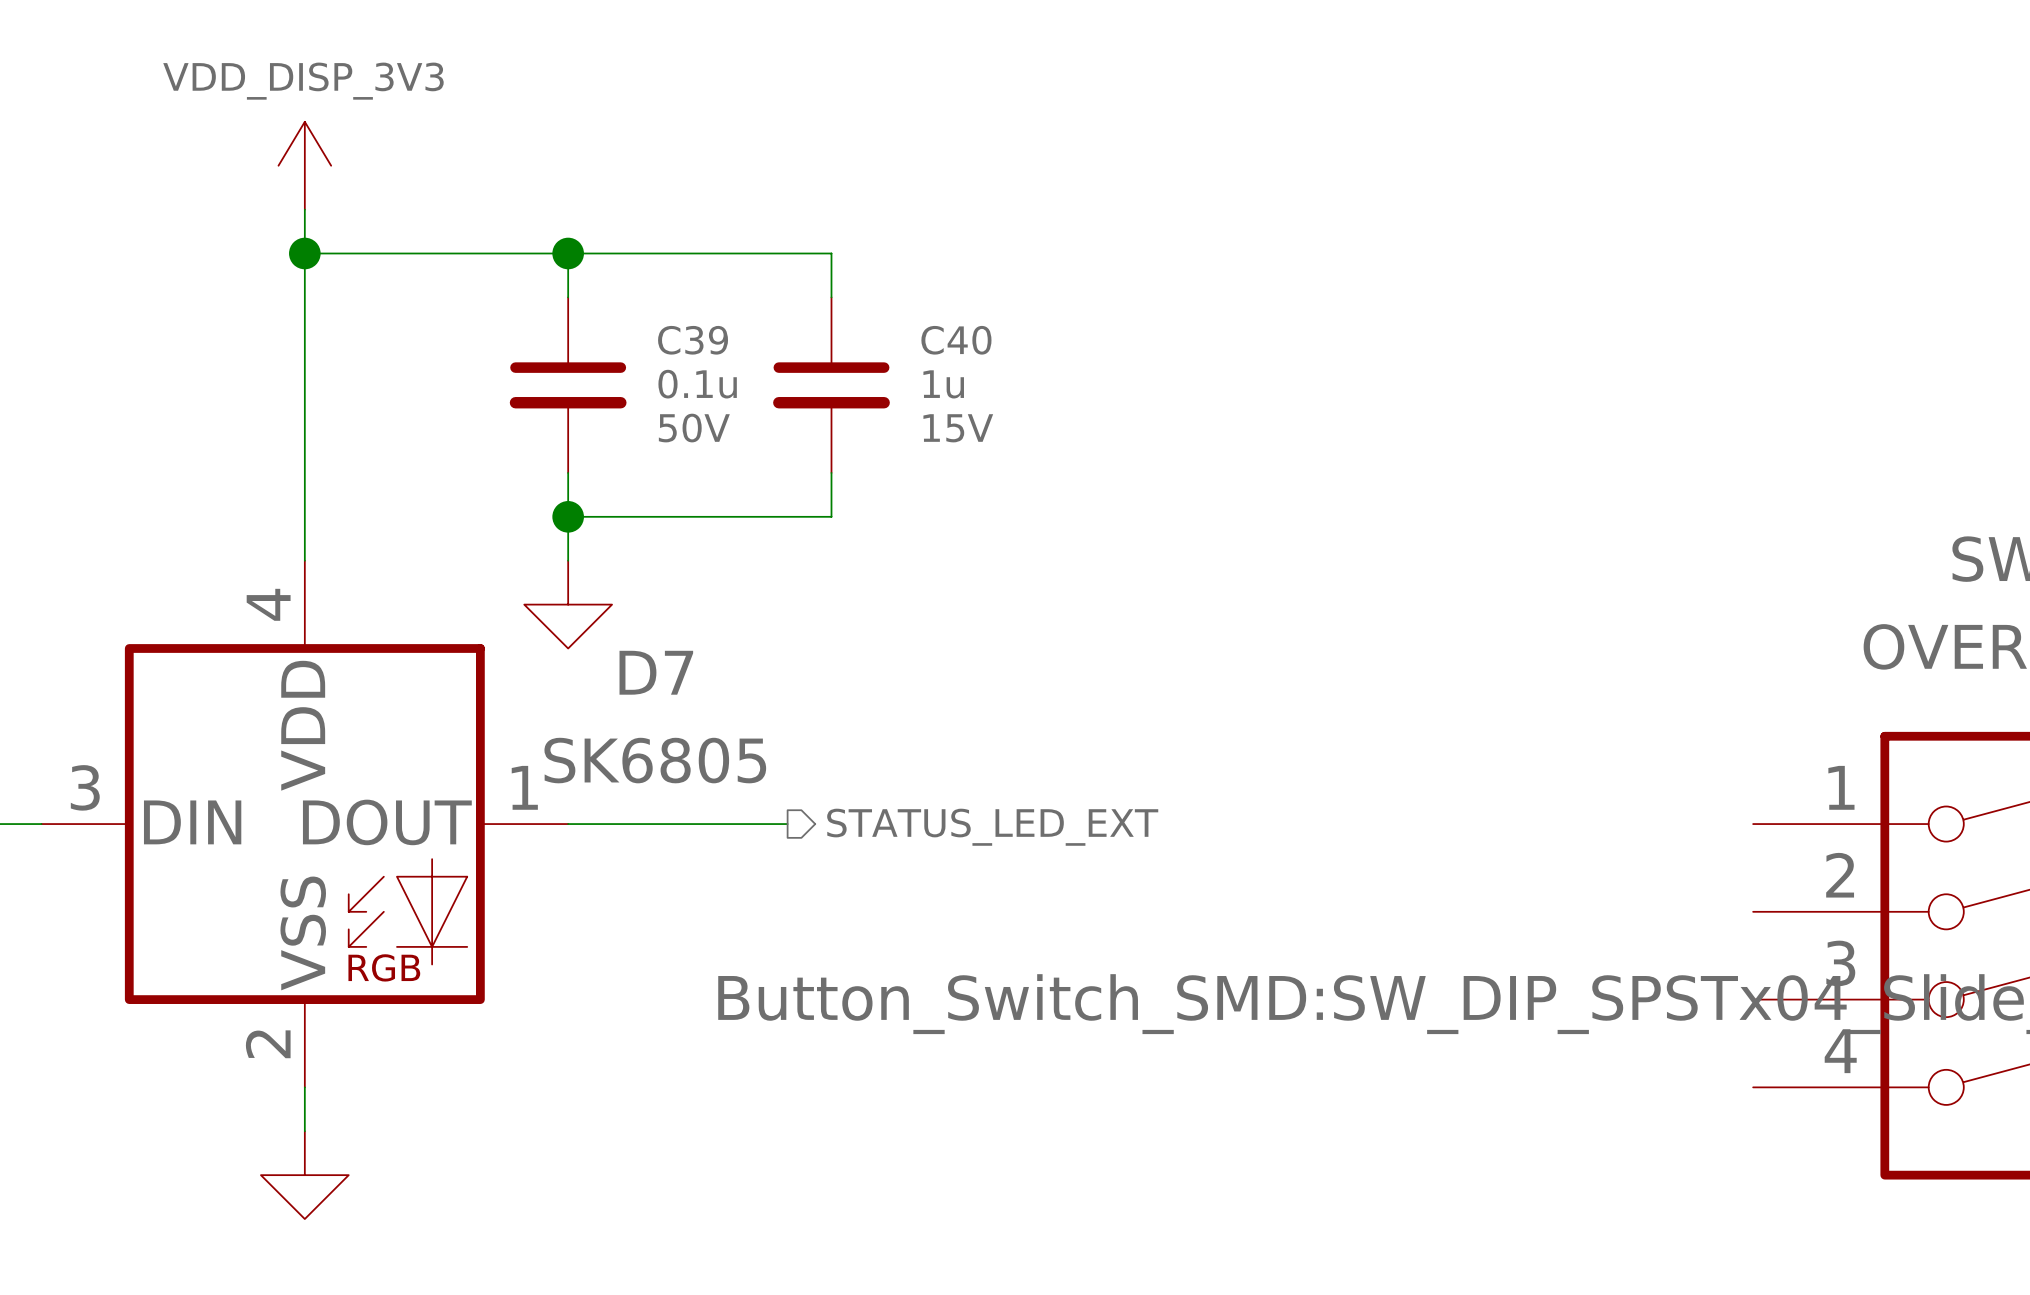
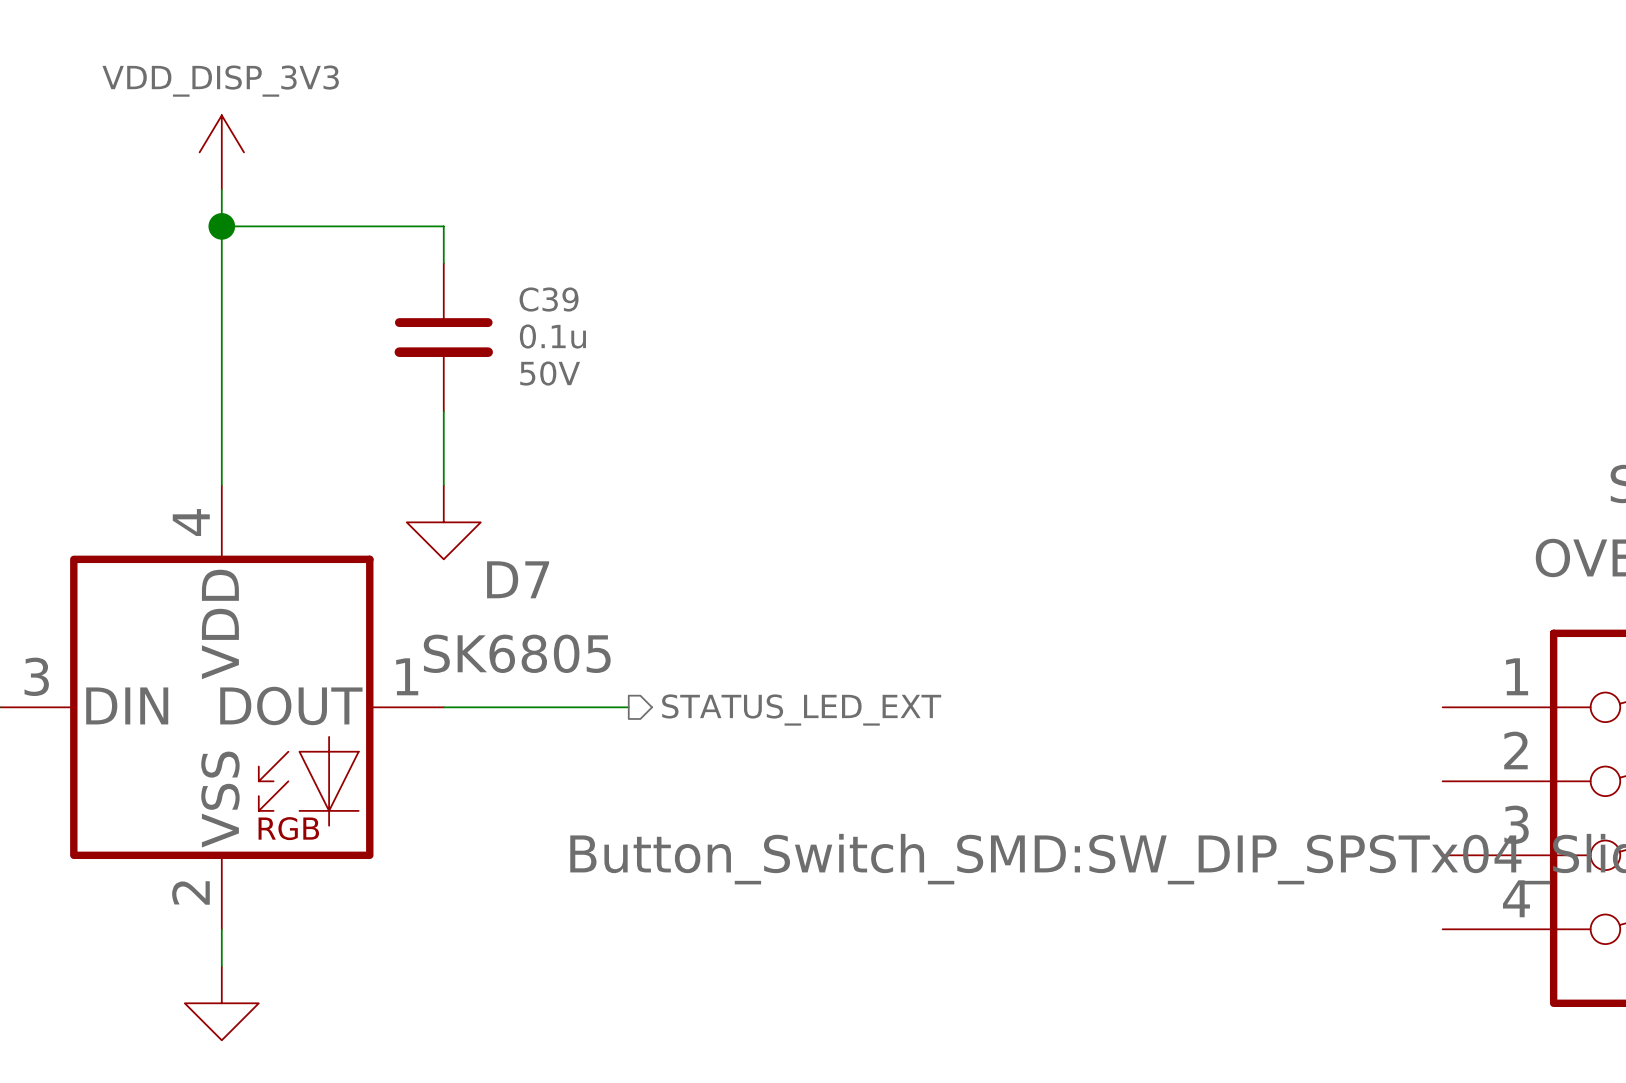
wire: (568, 253) (831, 253) (831, 297) -> none
junction: (568, 253) -> none
C40: 1u (831, 385) -> none
wire: (831, 472) (831, 516) (568, 516) -> none
junction: (568, 516) -> none

